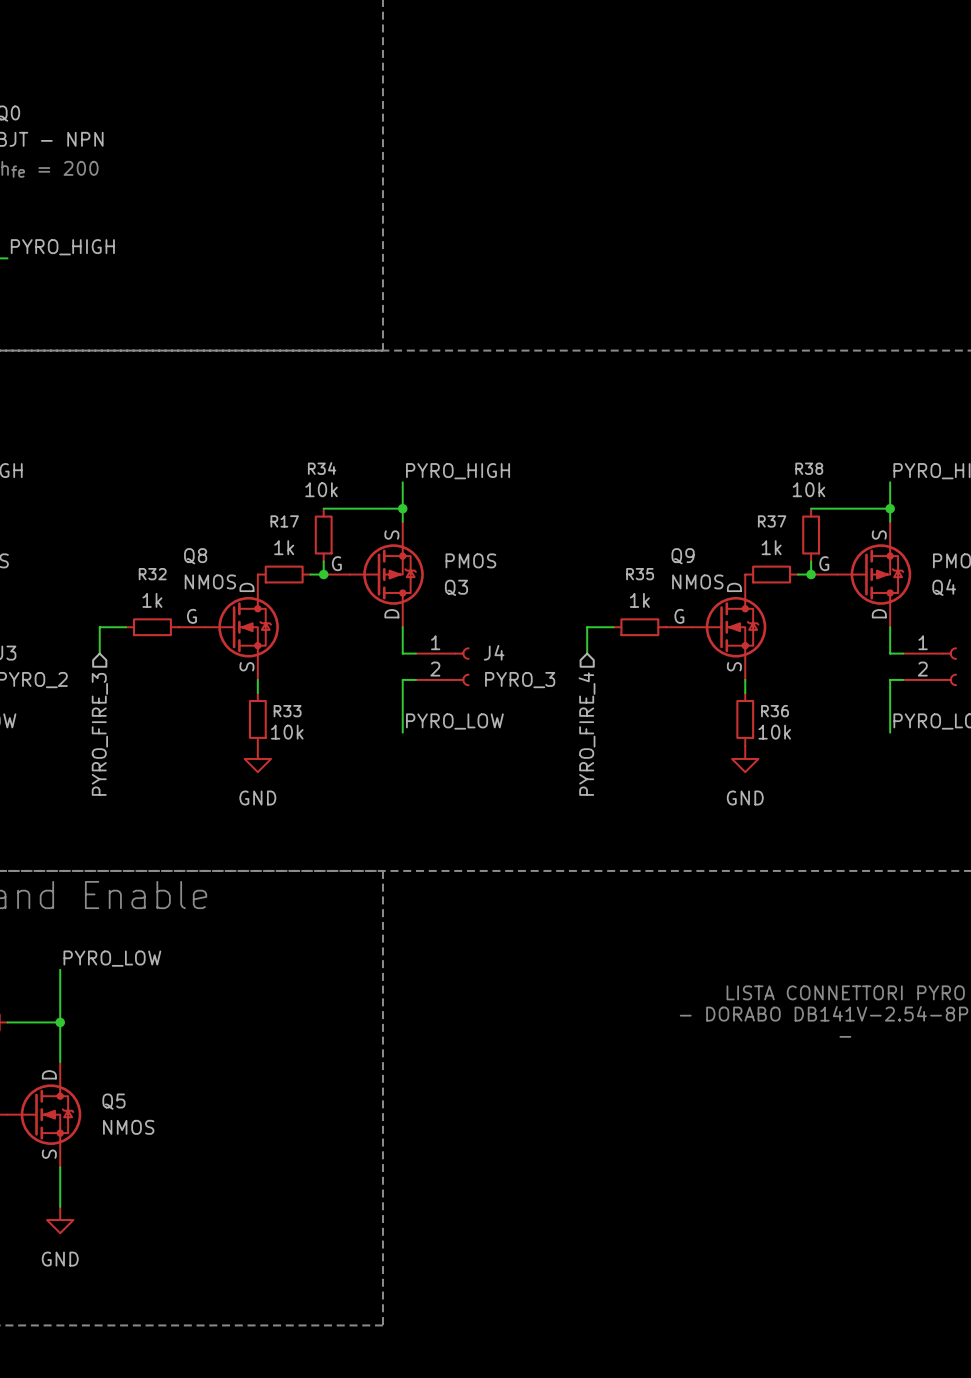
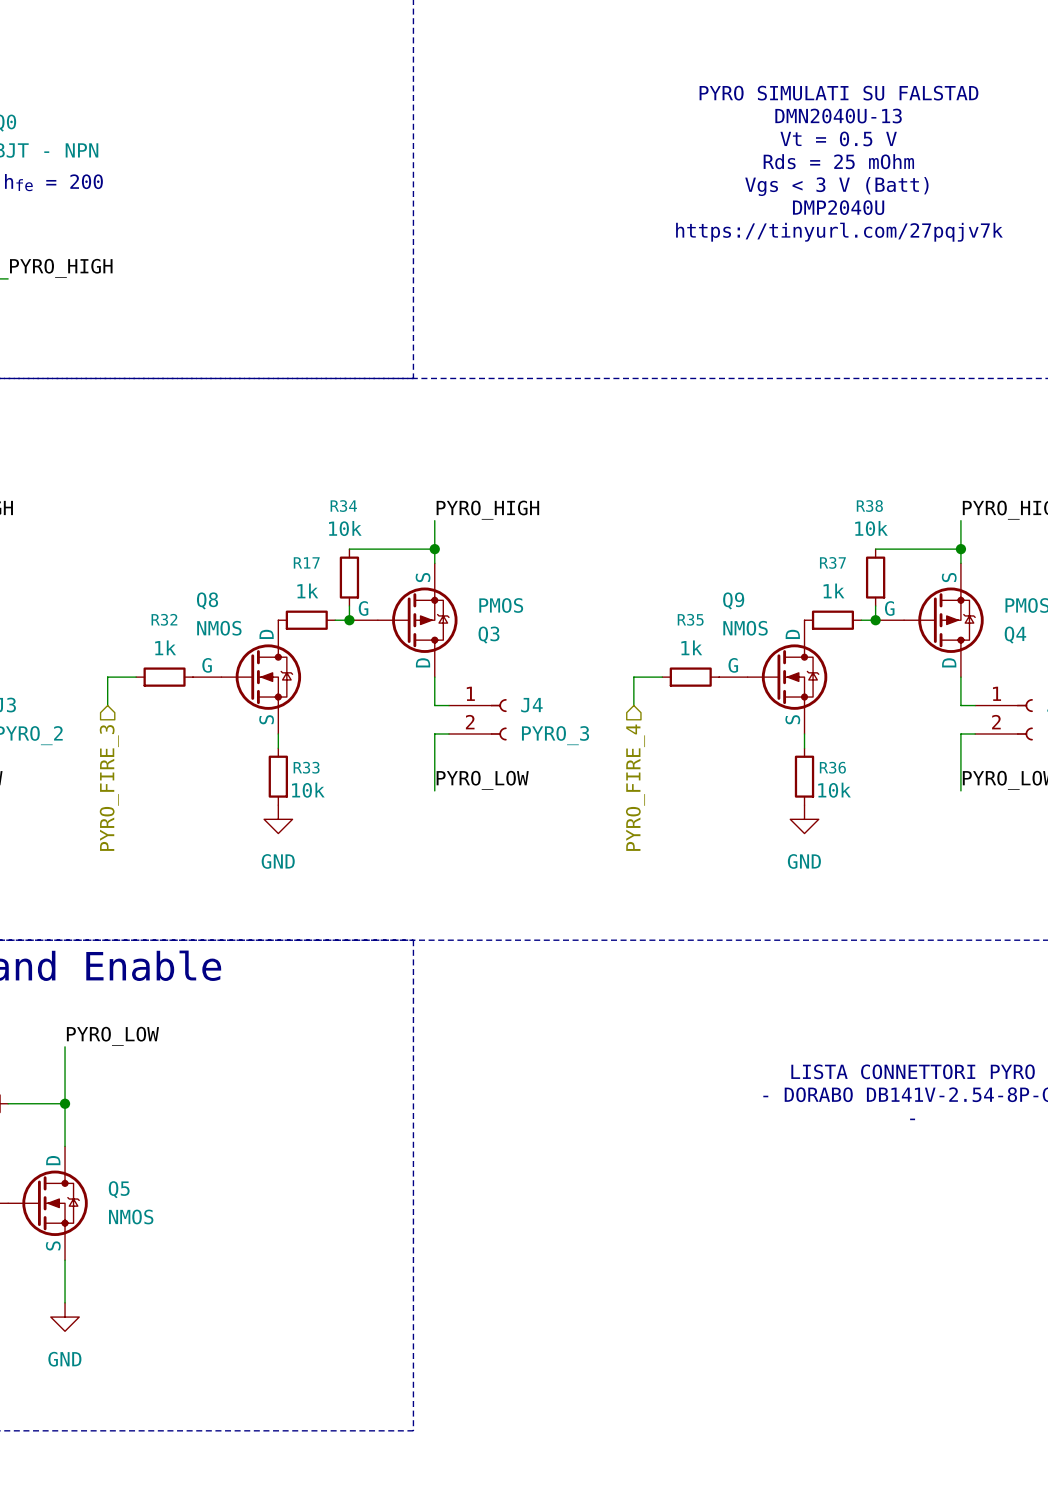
text: none -> PYRO SIMULATI SU FALSTAD (838, 93)
text: none -> DMN2040U-13 (838, 116)
text: none -> Vt = 0.5 V (838, 138)
text: none -> Rds = 25 mOhm (838, 161)
text: none -> Vgs < 3 V (Batt) (836, 186)
text: none -> DMP2040U (838, 207)
text: none -> https://tinyurl.com/27pqjv7k (839, 232)

